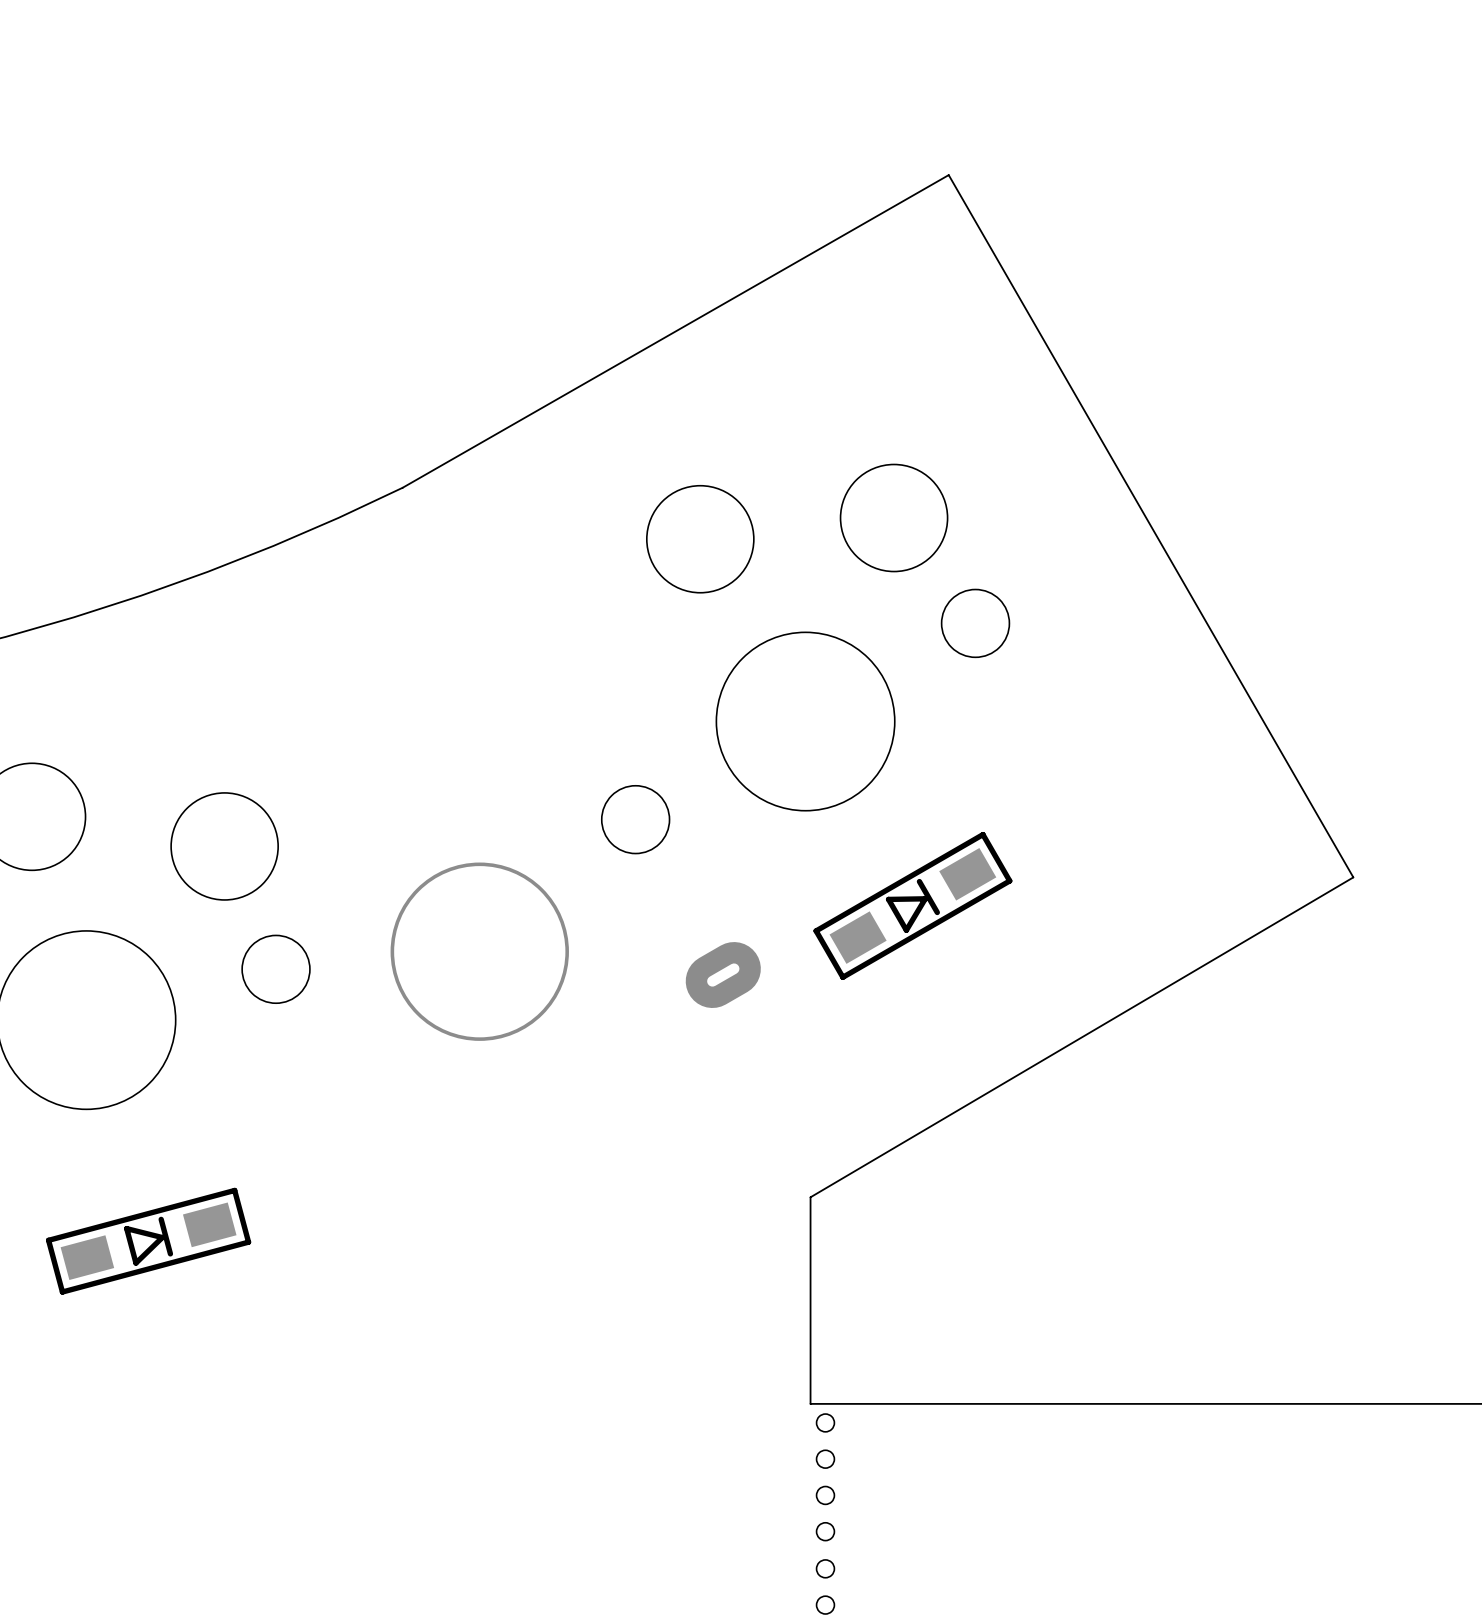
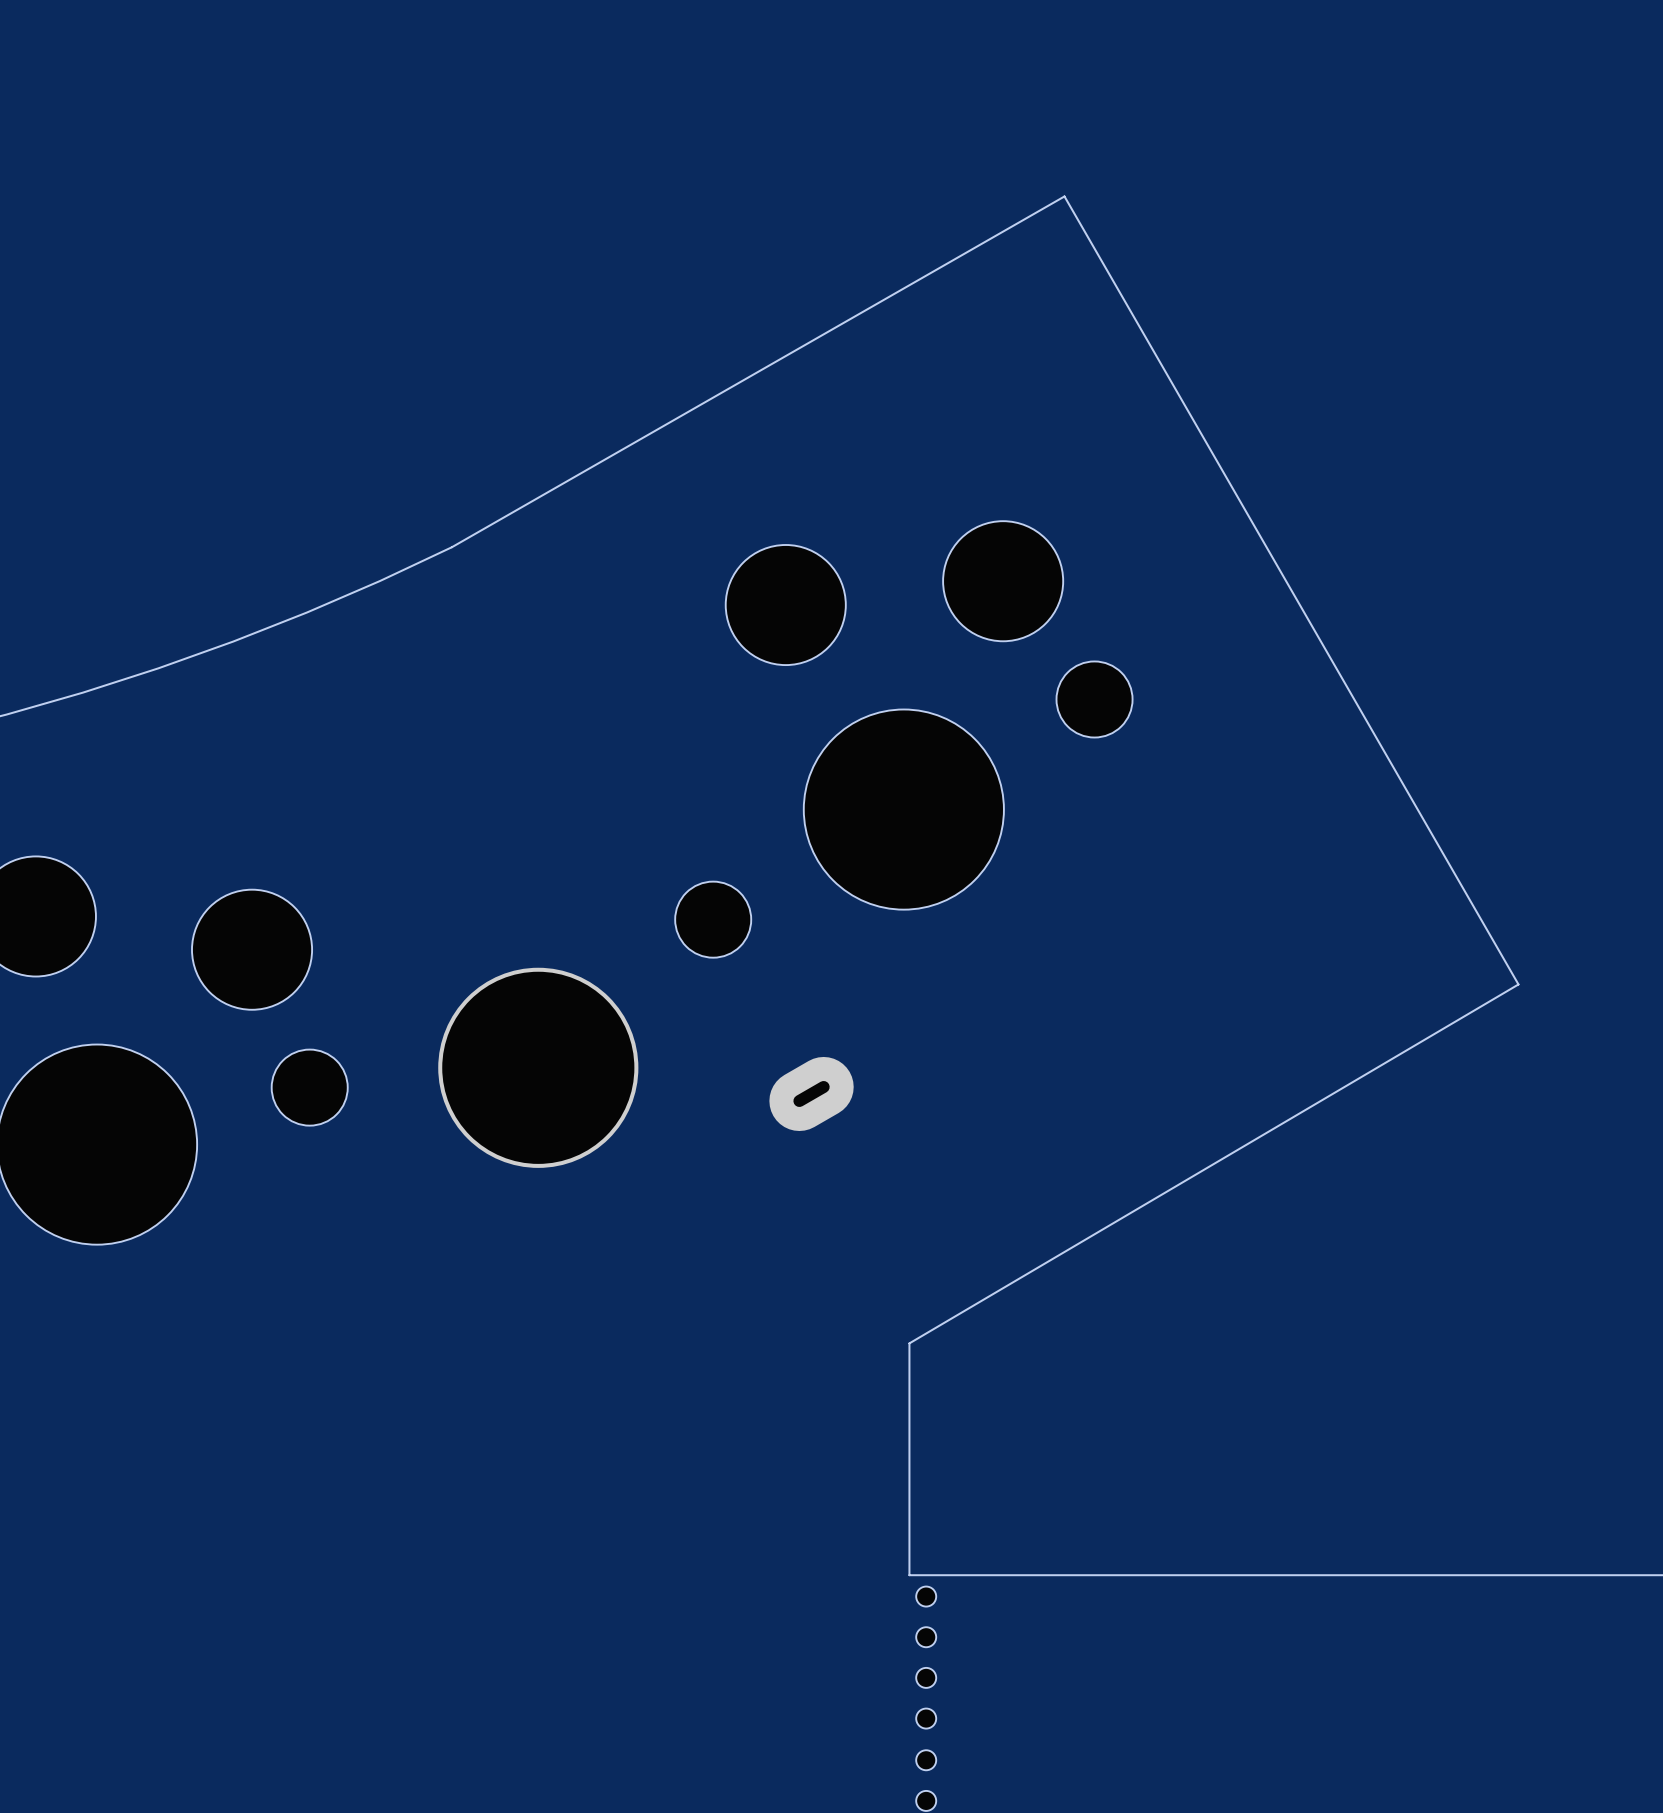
part: (912, 905) -> none
part: (148, 1241) -> none

